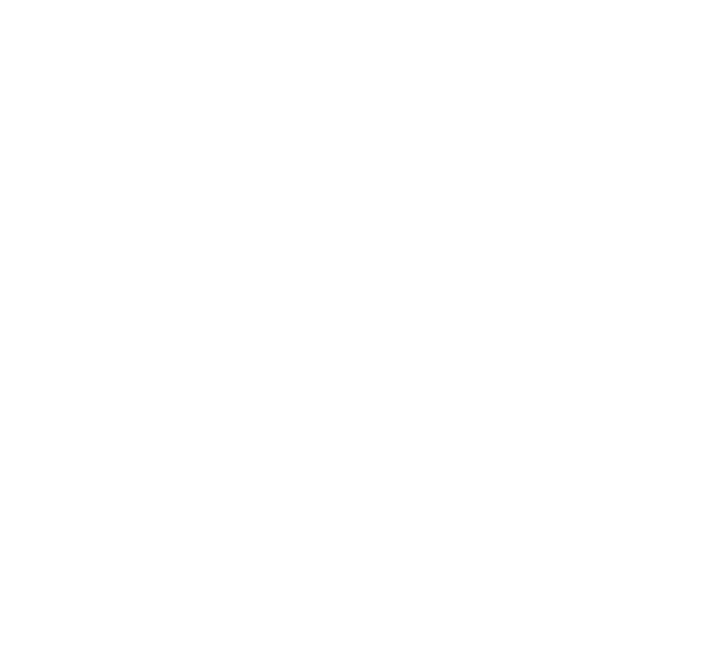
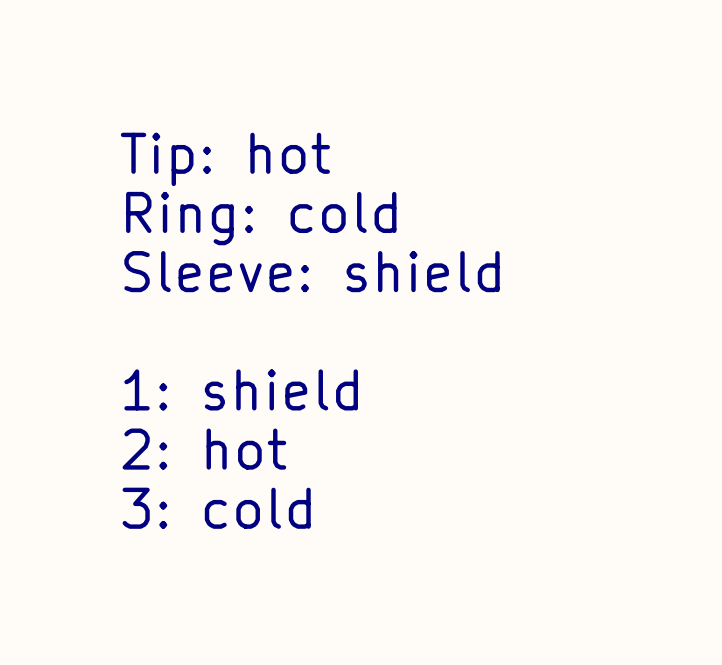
text: none -> Tip: hot (225, 159)
text: none -> Ring: cold (261, 218)
text: none -> Sleeve: shield (312, 271)
text: none -> 1: shield (241, 389)
text: none -> 2: hot (204, 449)
text: none -> 3: cold (216, 508)

